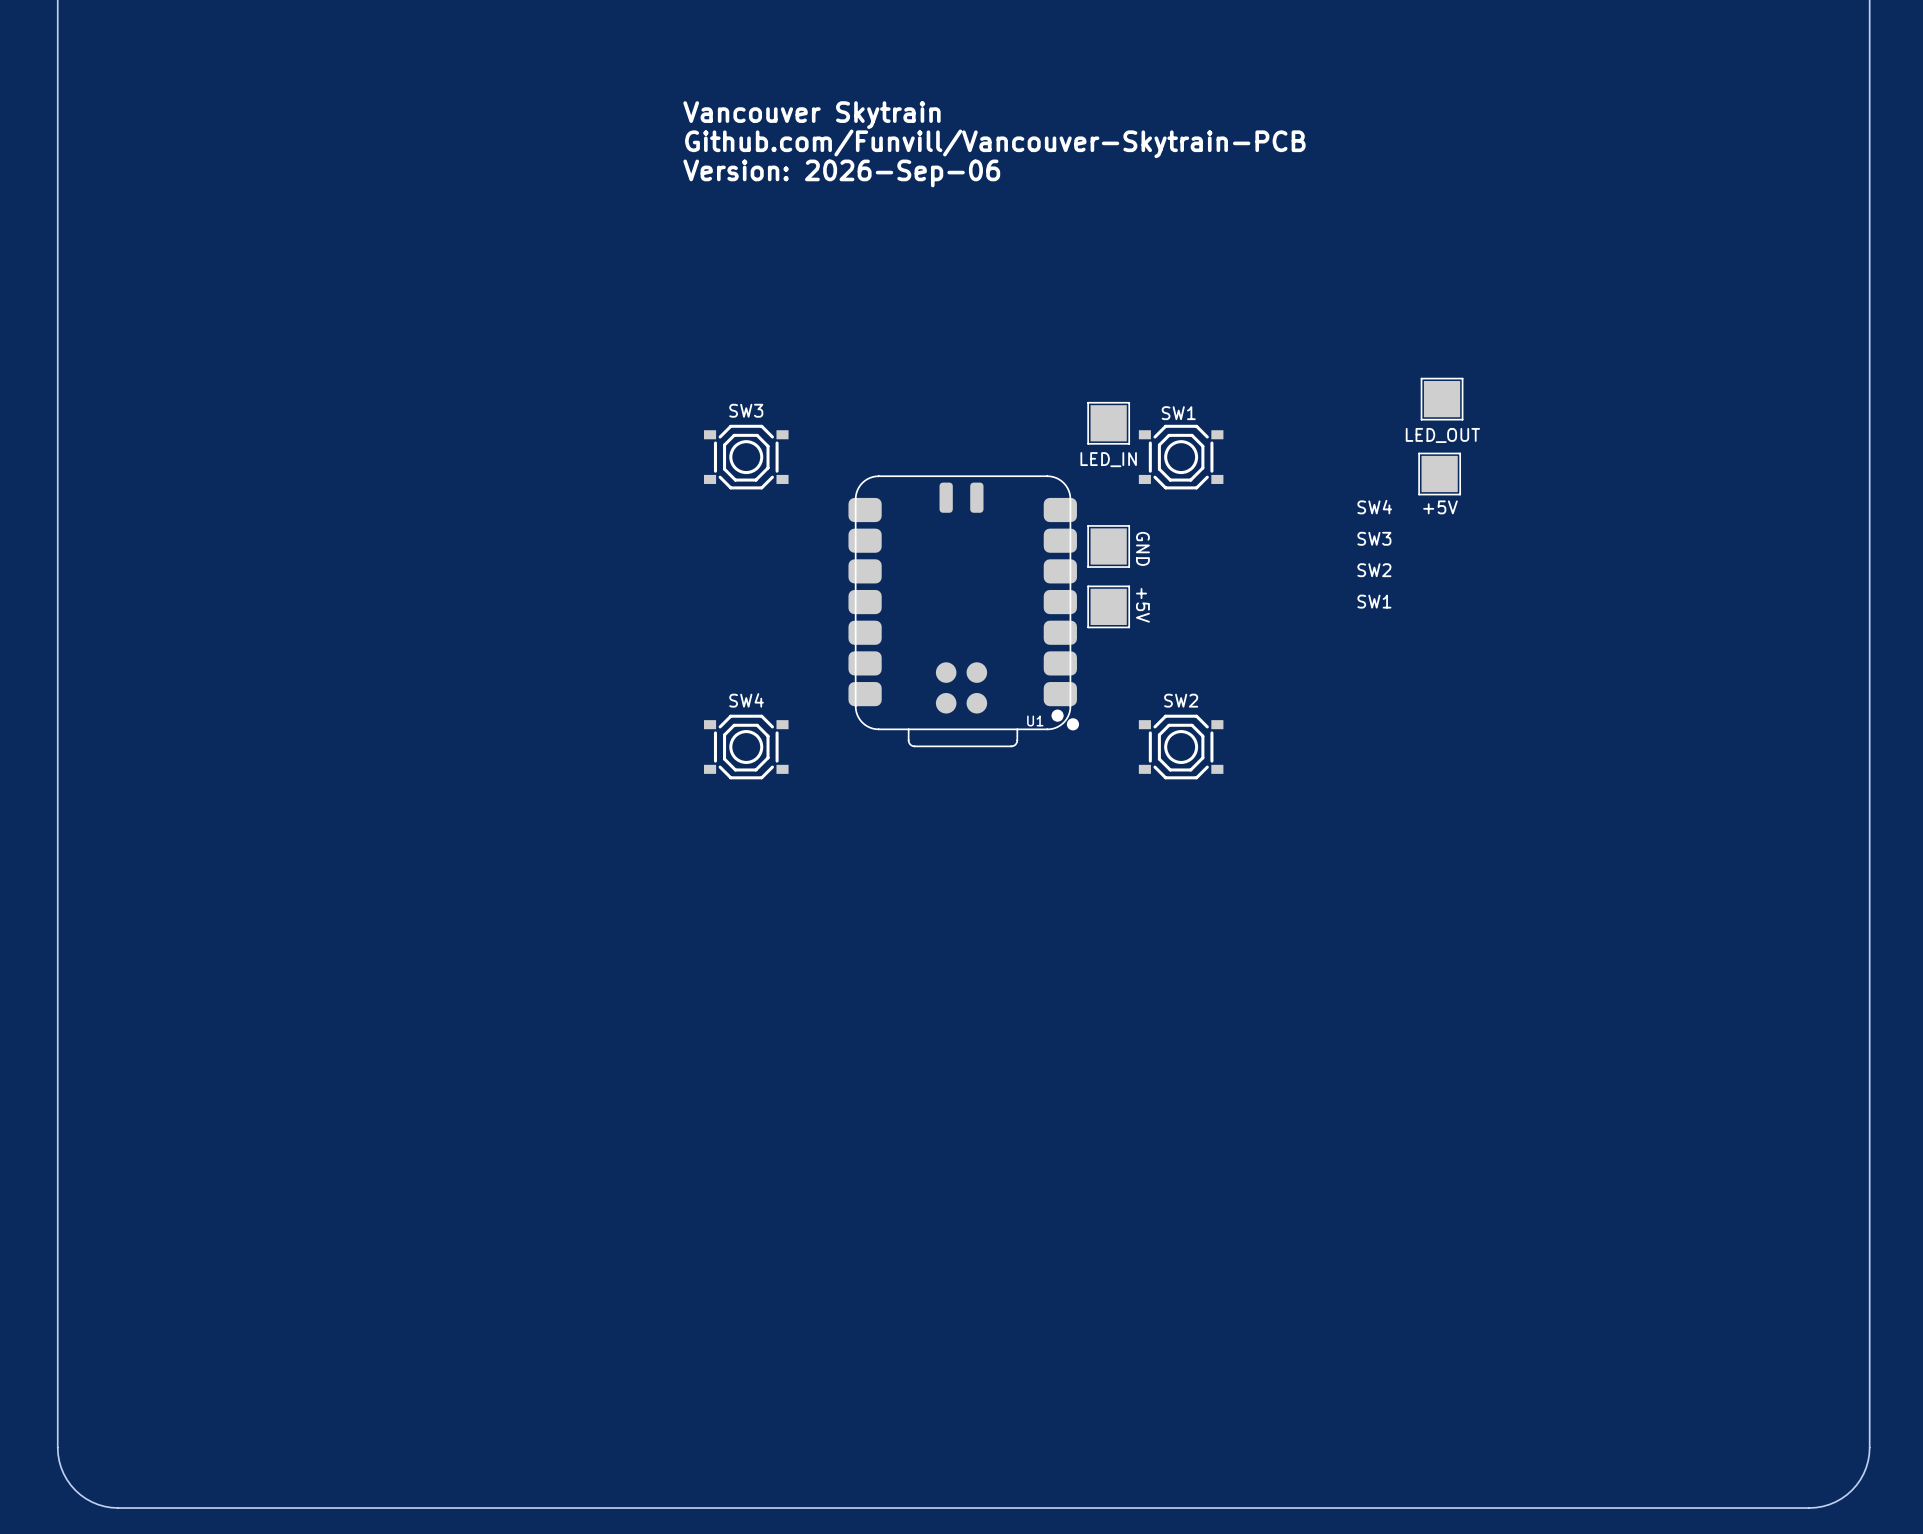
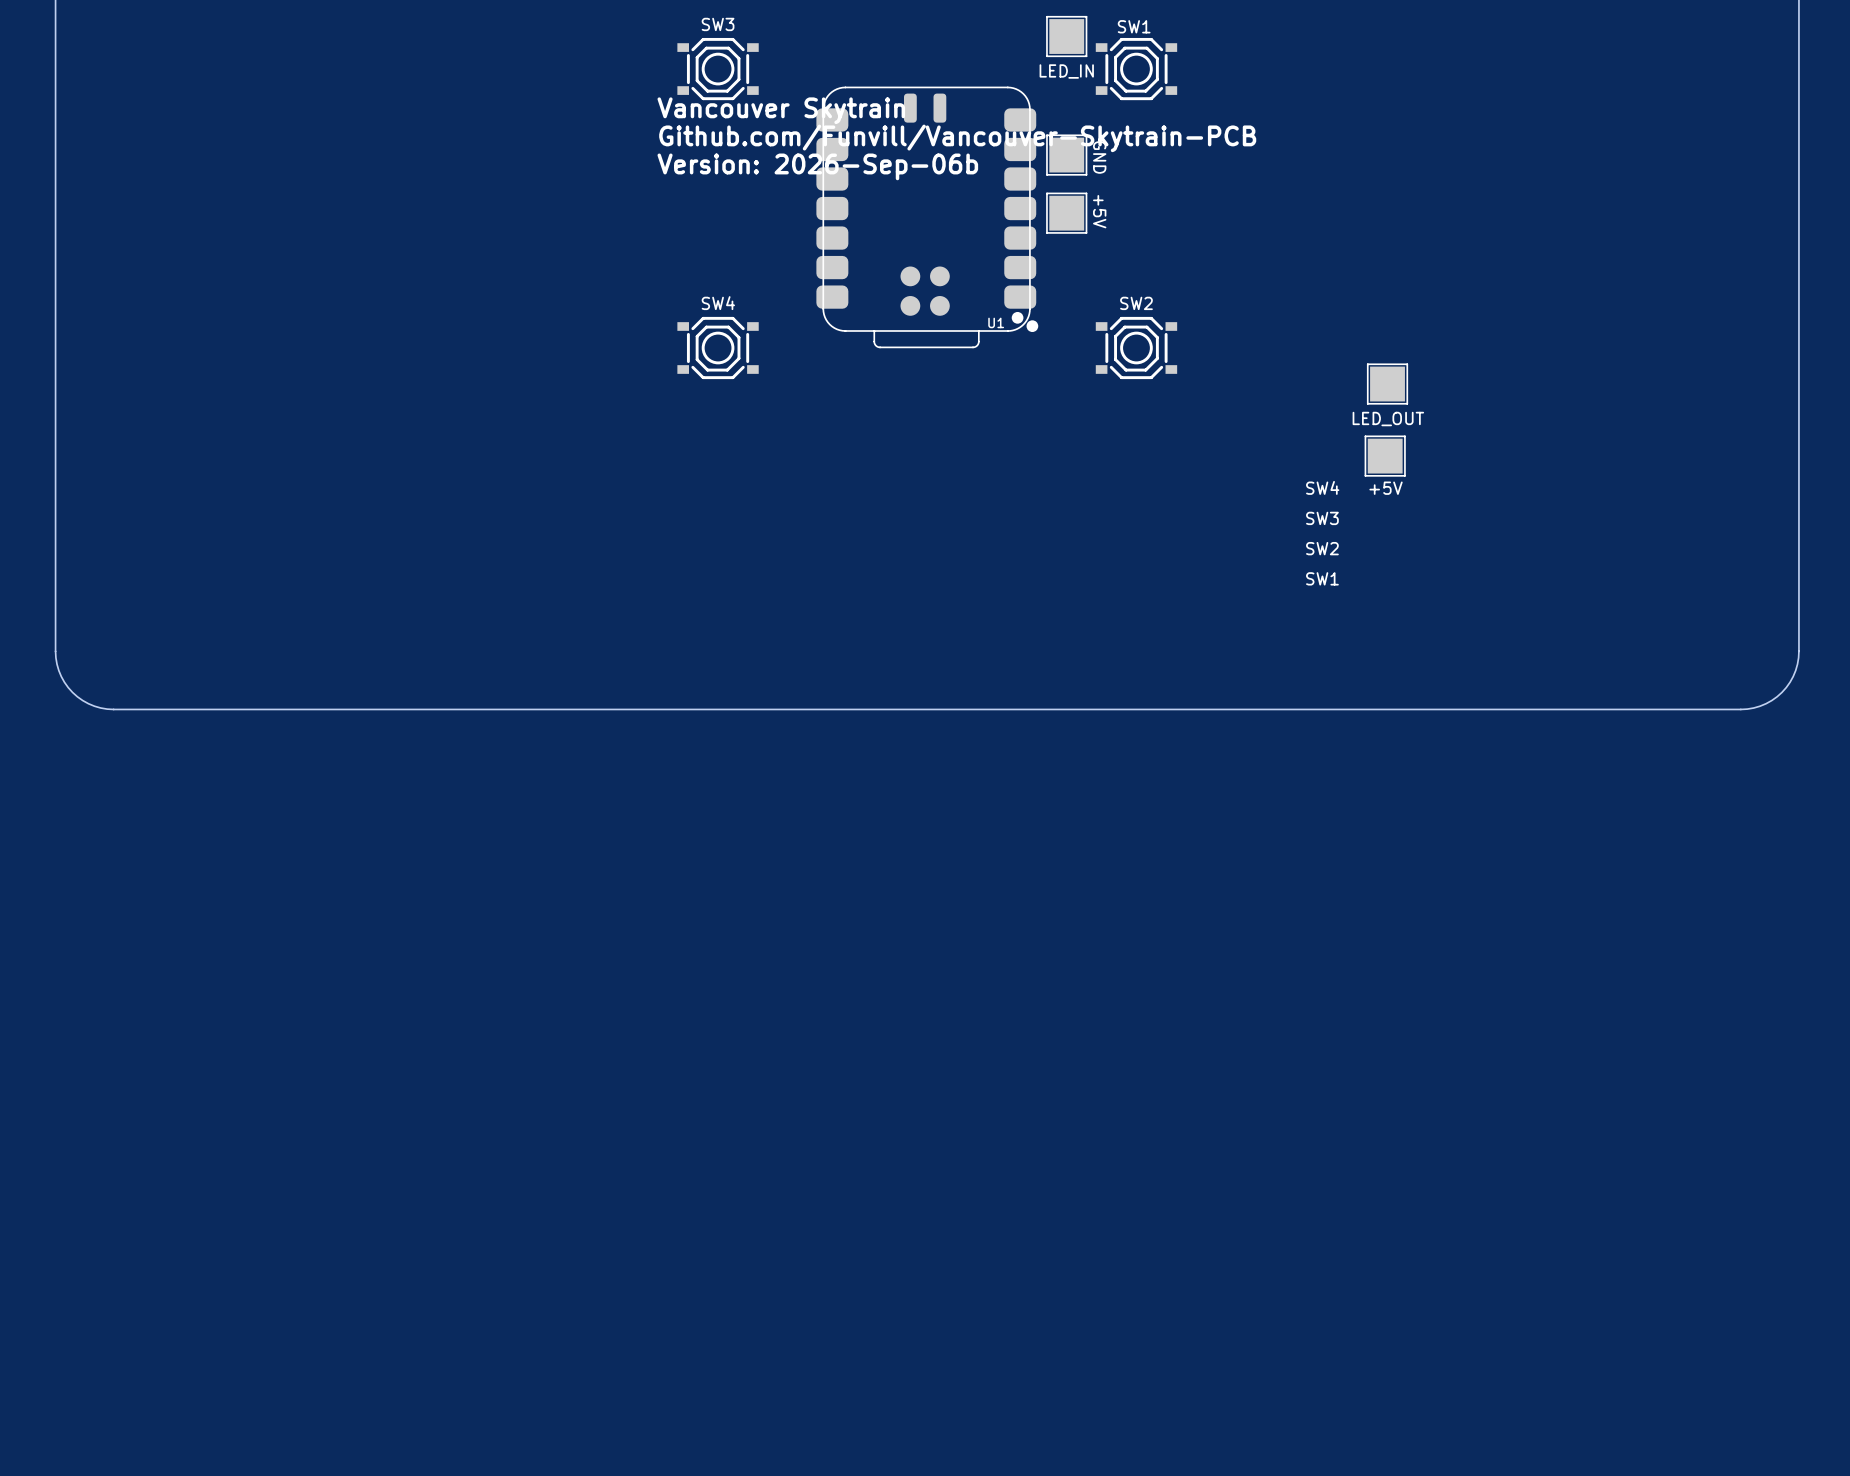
LED_IN: none -> (1066, 36)
GND: none -> (1066, 155)
text: Version: 2026-Sep-06 (841, 173) -> Version: 2026-Sep-06b (817, 166)
+5V: none -> (1066, 213)
LED_IN: (1108, 423) -> none
SW3 position: (746, 457) -> (718, 69)
SW1 position: (1181, 457) -> (1136, 69)
GND: (1108, 546) -> none
+5V: (1108, 606) -> none
U1 position: (963, 611) -> (927, 217)
board edge: (1869, 676) (1869, 1454) (1863, 1473) (1851, 1490) (1835, 1502) (1822, 1506) (1809, 1508) (118, 1508) (104, 1506) (91, 1502) (75, 1490) (67, 1479) (61, 1467) (57, 1447) (57, 676) -> (1798, 651) (1793, 676) (1781, 692) (1760, 706) (1740, 709) (113, 709) (94, 706) (72, 692) (58, 670) (55, 651)
SW4 position: (746, 747) -> (718, 348)
SW2 position: (1181, 747) -> (1136, 348)

